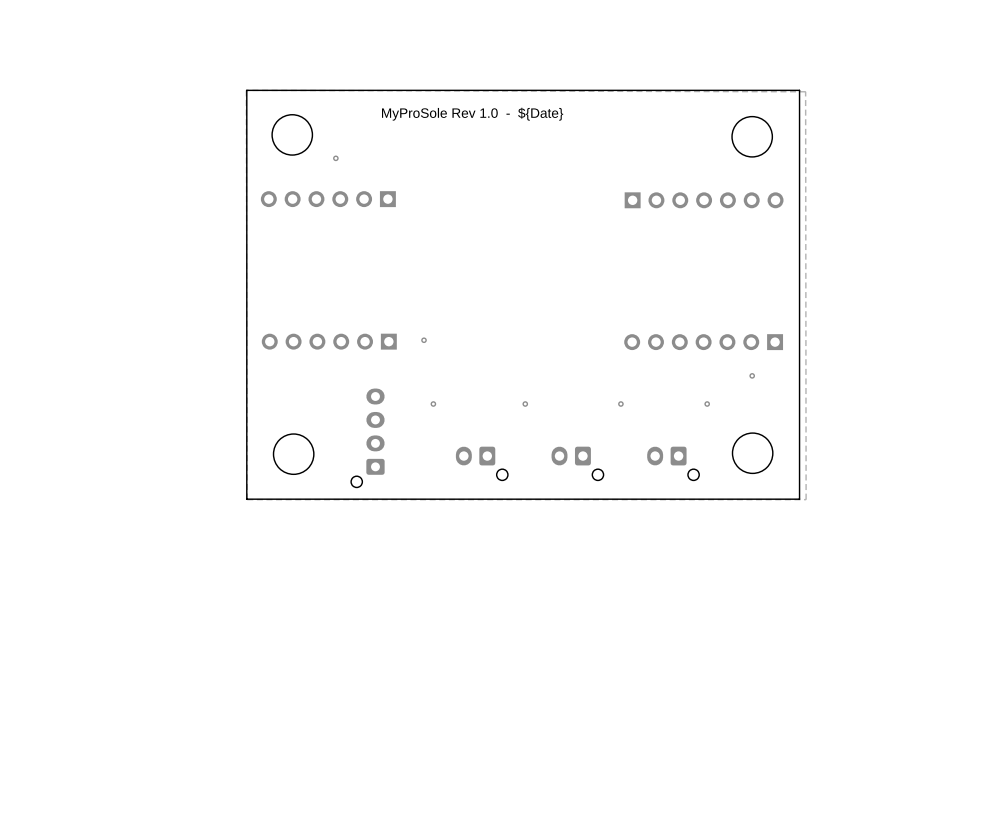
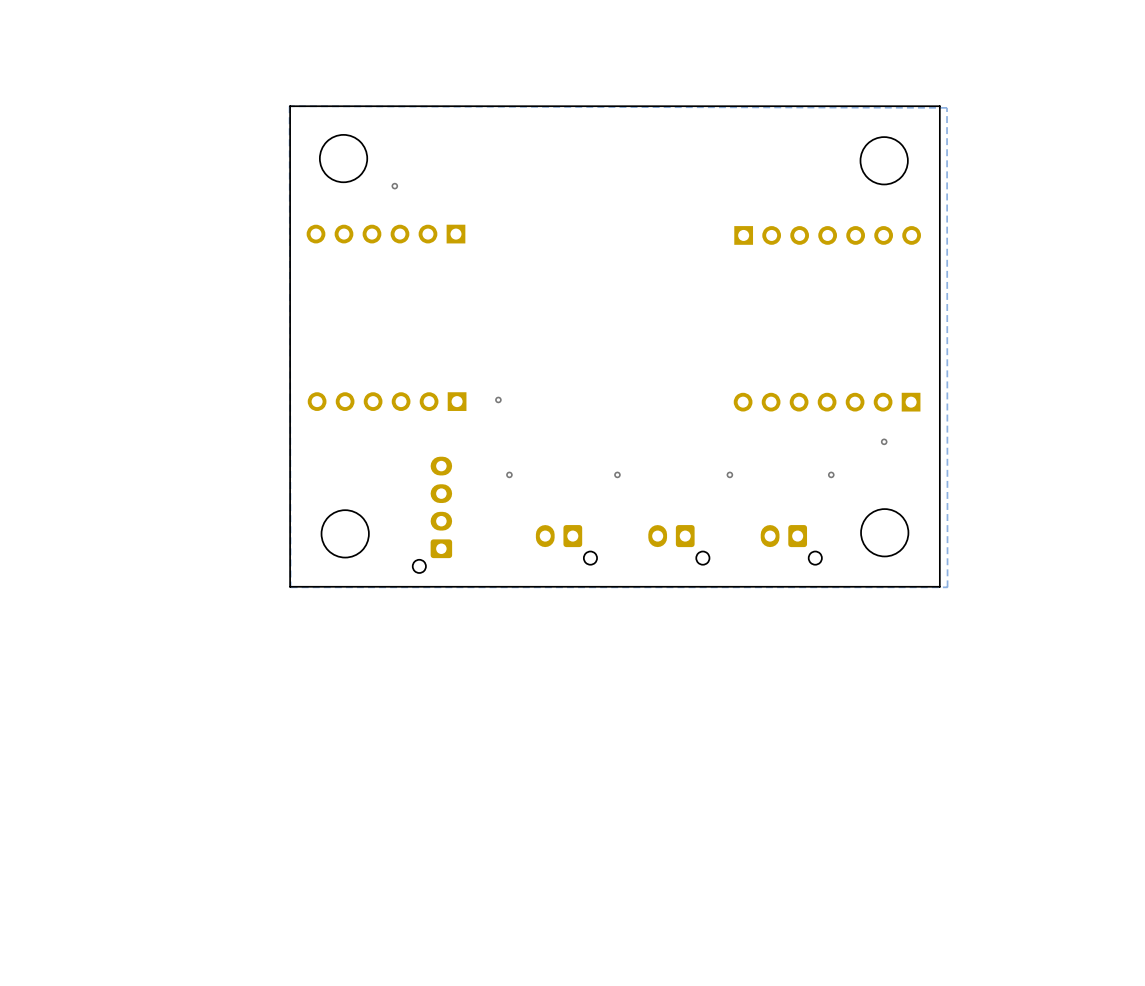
text: MyProSole Rev 1.0 - ${Date} (472, 114) -> none

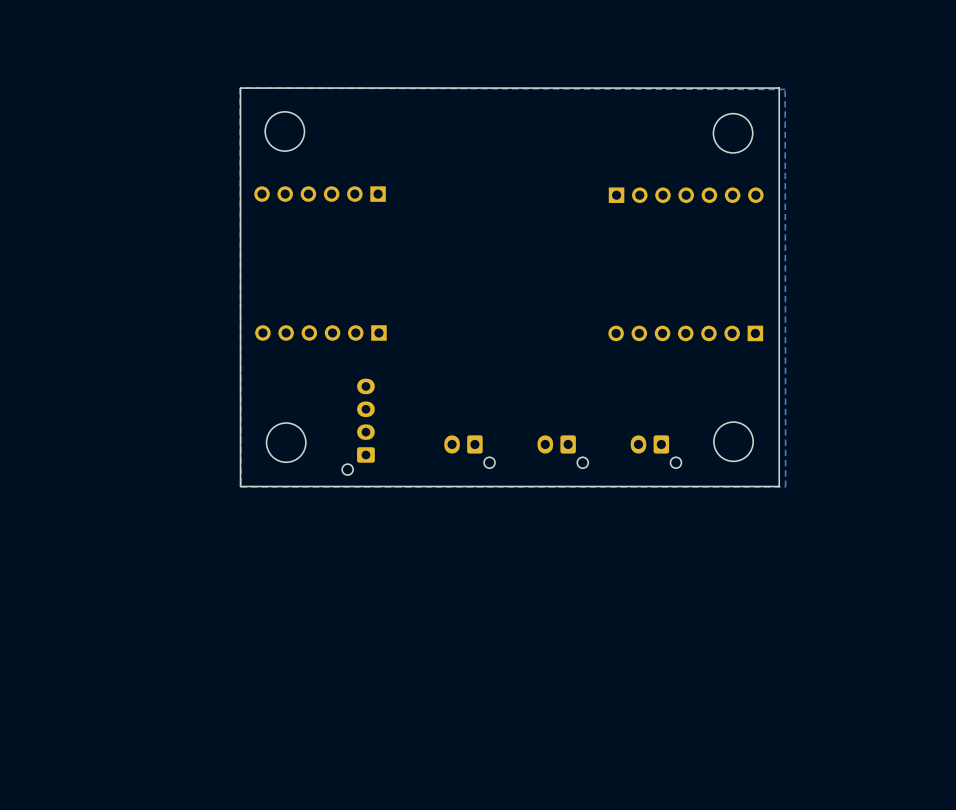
via: (394, 186) -> none
via: (498, 399) -> none
via: (884, 441) -> none
via: (509, 474) -> none
via: (617, 474) -> none
via: (729, 474) -> none
via: (831, 474) -> none

